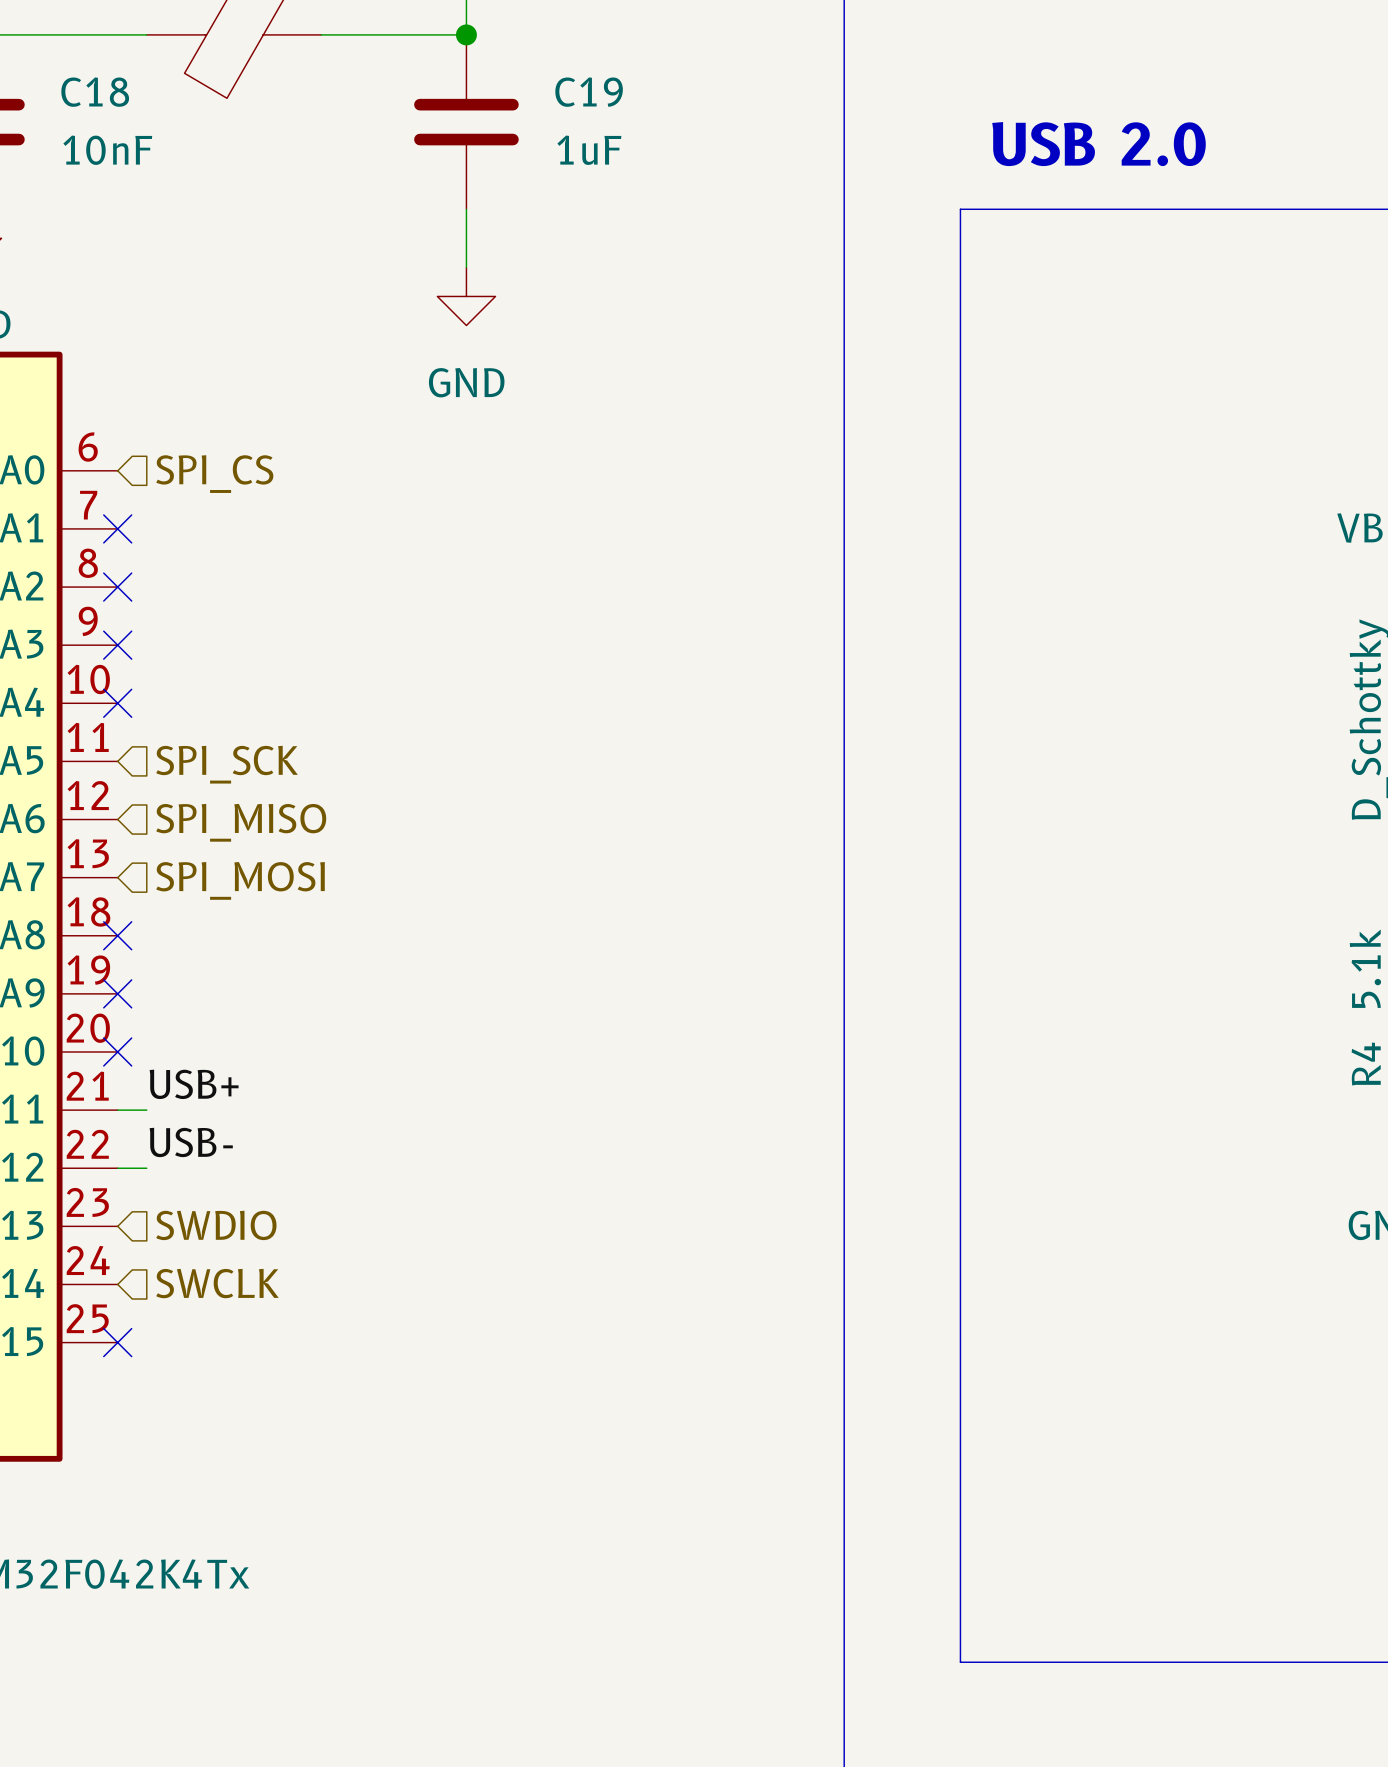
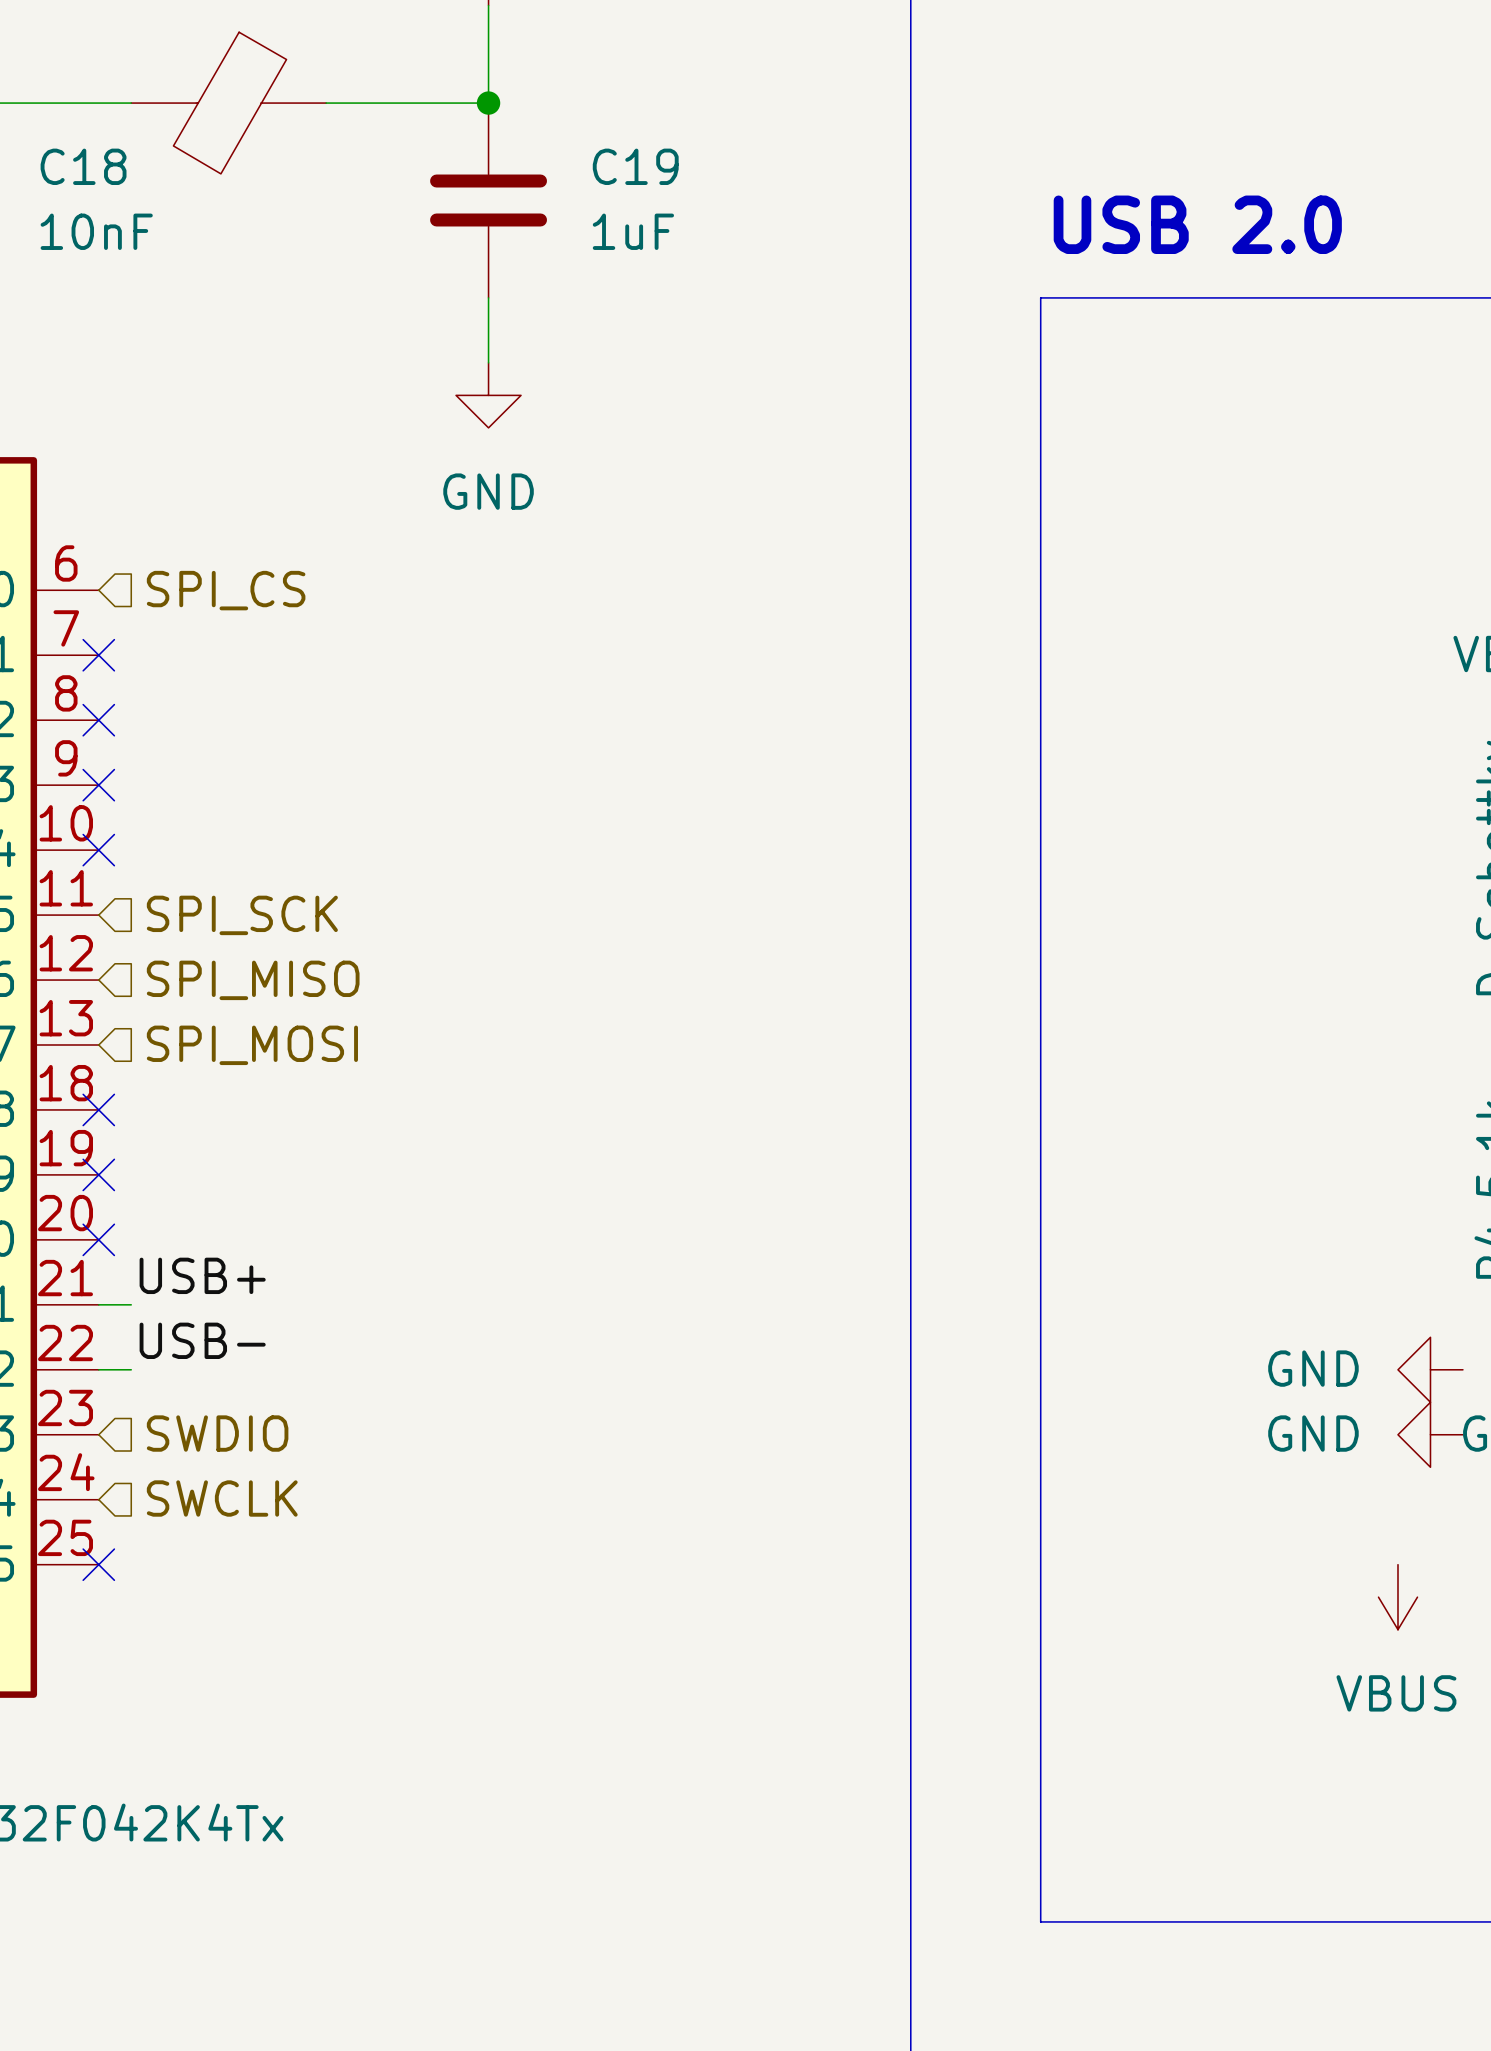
power symbol: none -> GND (1430, 1369)
power symbol: none -> GND (1430, 1434)
power symbol: none -> VBUS (1397, 1597)

